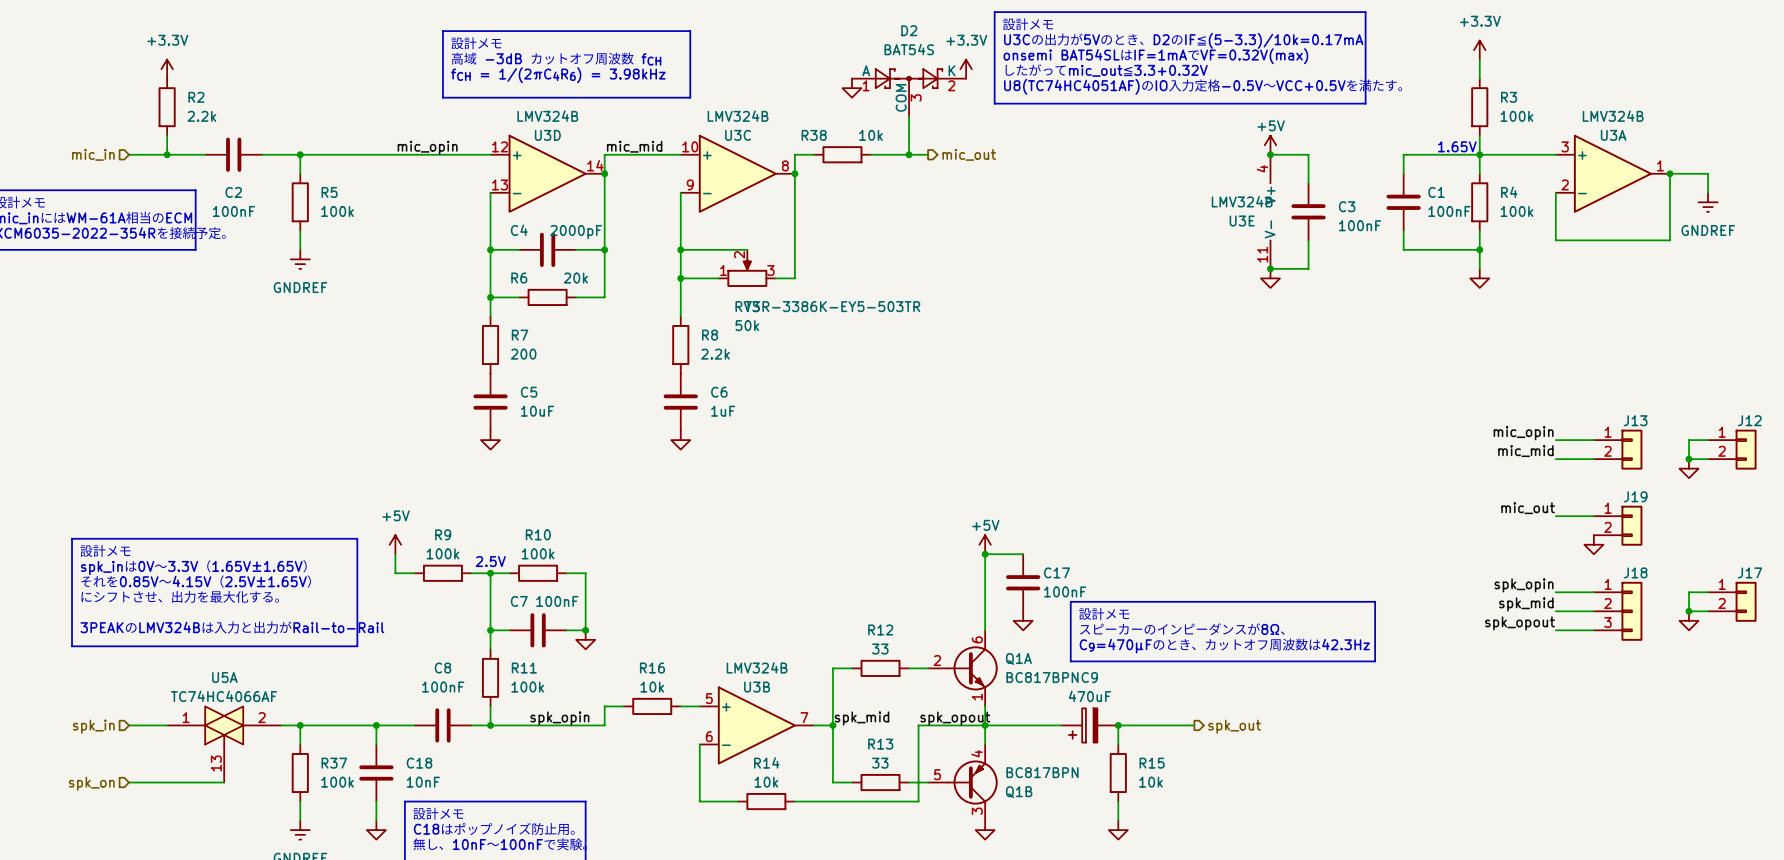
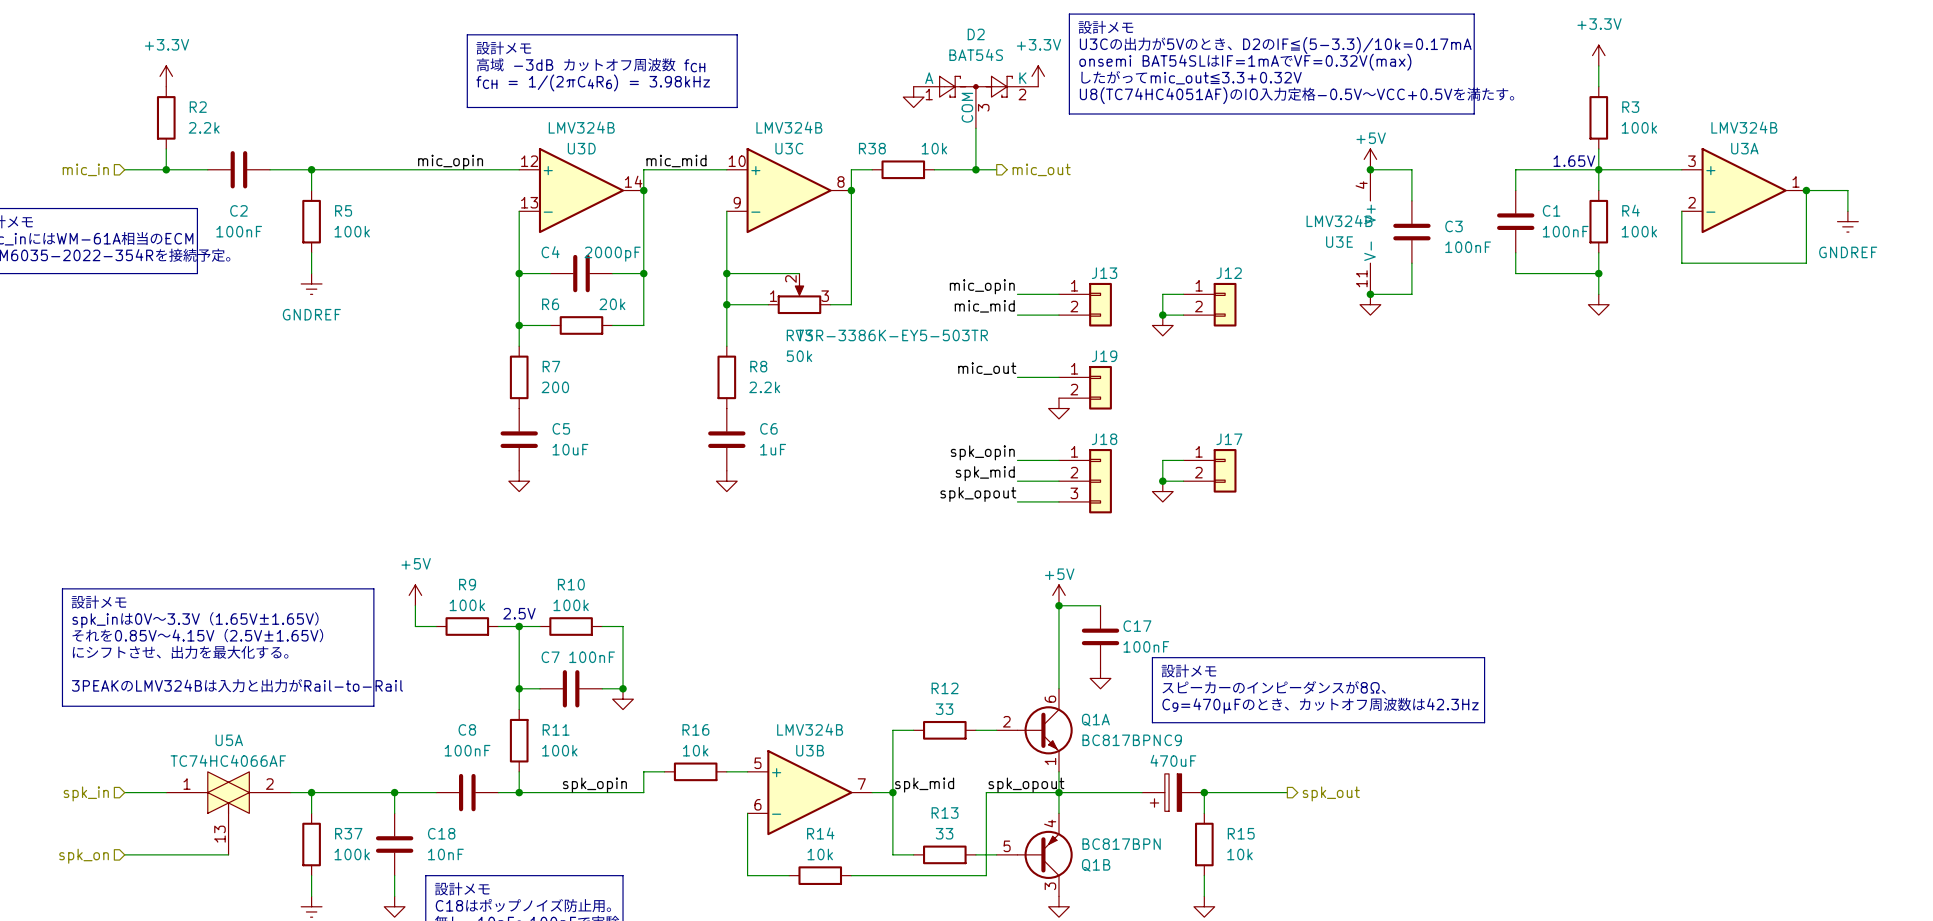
label: none -> mic_opin (982, 286)
wire: none -> (1017, 294) (1058, 294)
wire: none -> (1183, 294) (1162, 294) (1162, 315) (1183, 315)
label: none -> mic_mid (984, 306)
wire: none -> (1017, 315) (1058, 315)
junction: none -> (1162, 315)
power symbol: none -> (1162, 325)
label: none -> mic_out (987, 368)
wire: none -> (1017, 377) (1058, 377)
power symbol: none -> (1058, 408)
label: none -> spk_opin (982, 452)
wire: none -> (1017, 460) (1058, 460)
wire: none -> (1183, 460) (1162, 460) (1162, 481) (1183, 481)
label: none -> spk_mid (985, 473)
label: mic_opin (1523, 433) -> none
wire: none -> (1017, 481) (1058, 481)
junction: none -> (1162, 481)
wire: (1555, 440) (1593, 440) -> none
wire: (1708, 440) (1689, 440) (1689, 459) (1708, 459) -> none
power symbol: none -> (1162, 491)
J13 position: (1618, 449) -> (1085, 304)
J12 position: (1732, 449) -> (1210, 304)
label: mic_mid (1525, 451) -> none
label: none -> spk_opout (978, 494)
wire: none -> (1017, 501) (1058, 501)
wire: (1555, 459) (1593, 459) -> none
junction: (1689, 459) -> none
power symbol: (1689, 468) -> none
label: mic_out (1528, 508) -> none
wire: (1555, 516) (1593, 516) -> none
J19 position: (1618, 525) -> (1085, 387)
power symbol: (1593, 544) -> none
label: spk_opin (1524, 585) -> none
wire: (1555, 592) (1593, 592) -> none
wire: (1708, 592) (1689, 592) (1689, 611) (1708, 611) -> none
J17 position: (1732, 601) -> (1210, 470)
label: spk_mid (1526, 604) -> none
wire: (1555, 611) (1593, 611) -> none
J18 position: (1618, 611) -> (1085, 481)
junction: (1689, 611) -> none
power symbol: (1689, 620) -> none
label: spk_opout (1519, 623) -> none
wire: (1555, 630) (1593, 630) -> none

